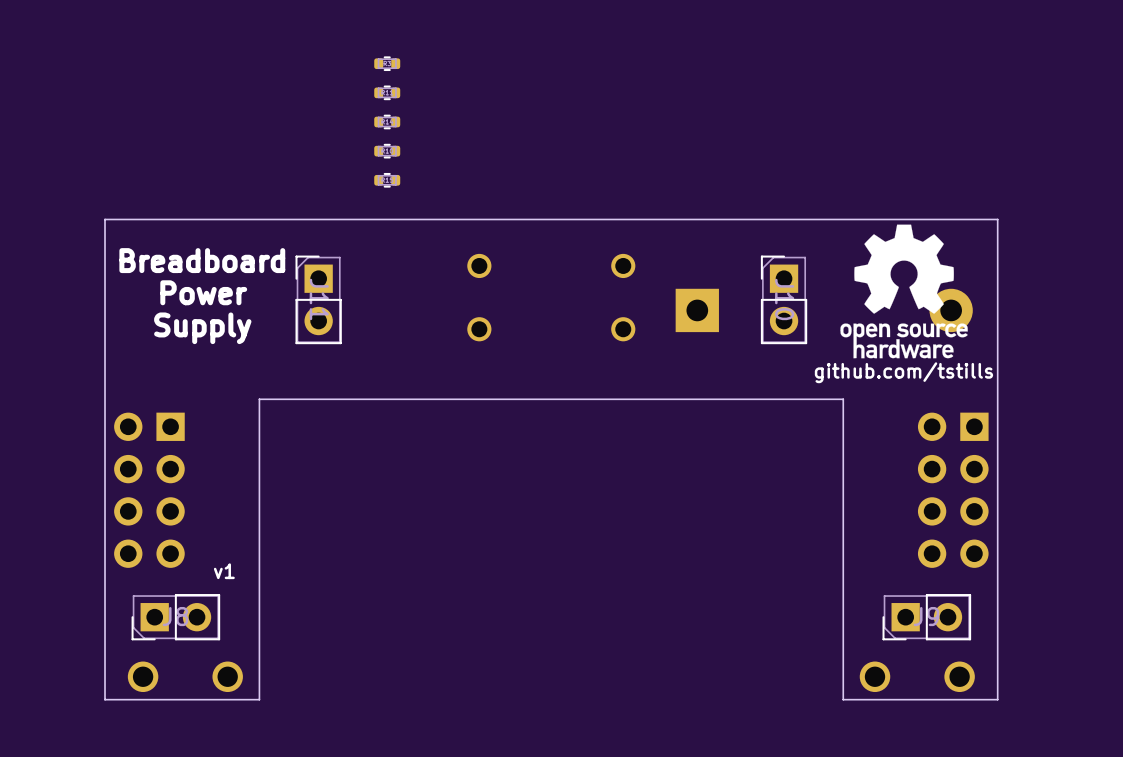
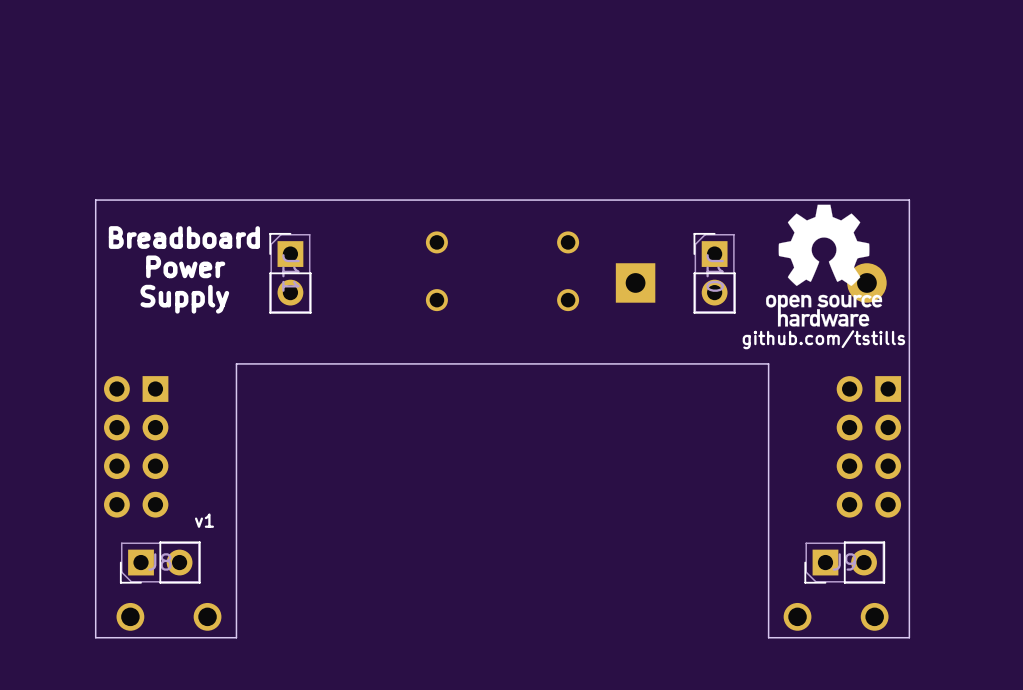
part: (387, 63) -> none
part: (387, 92) -> none
part: (387, 121) -> none
part: (387, 151) -> none
part: (387, 180) -> none

